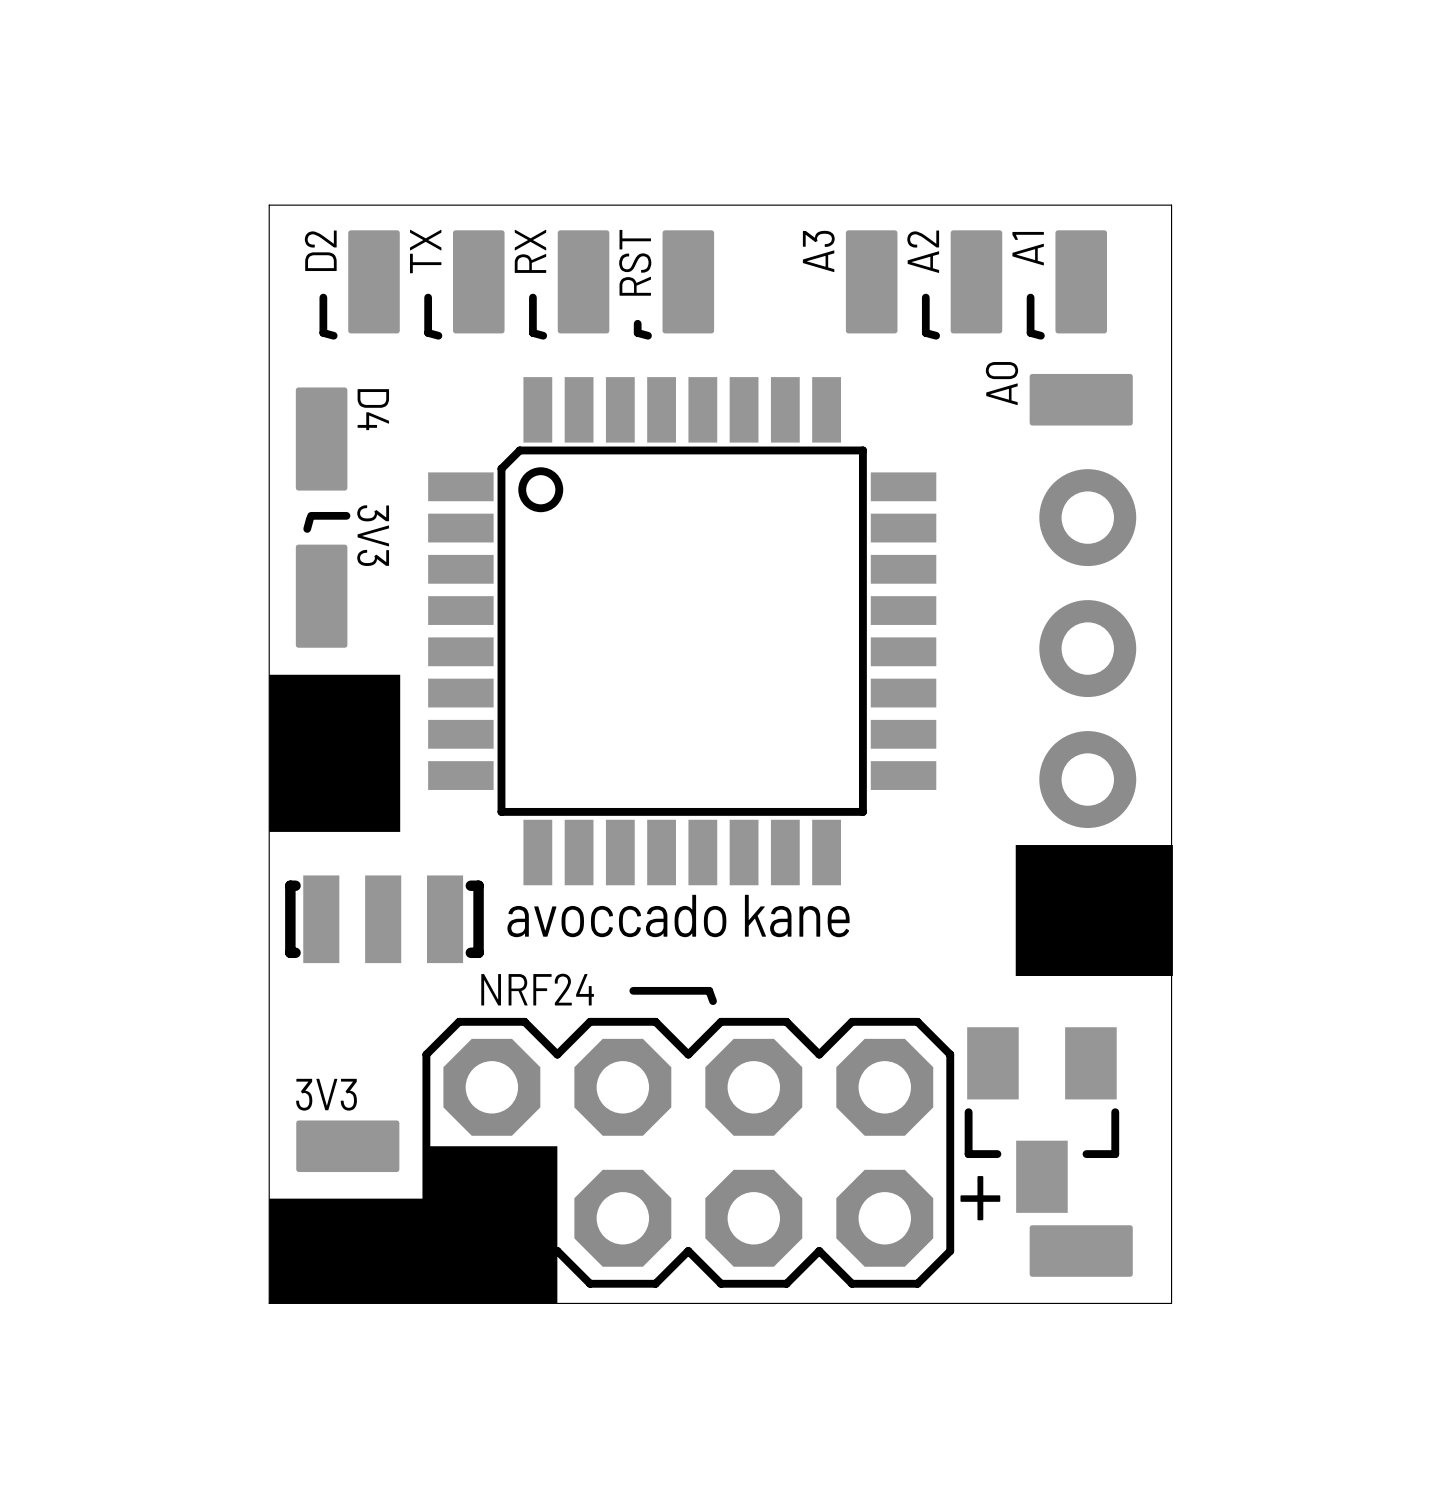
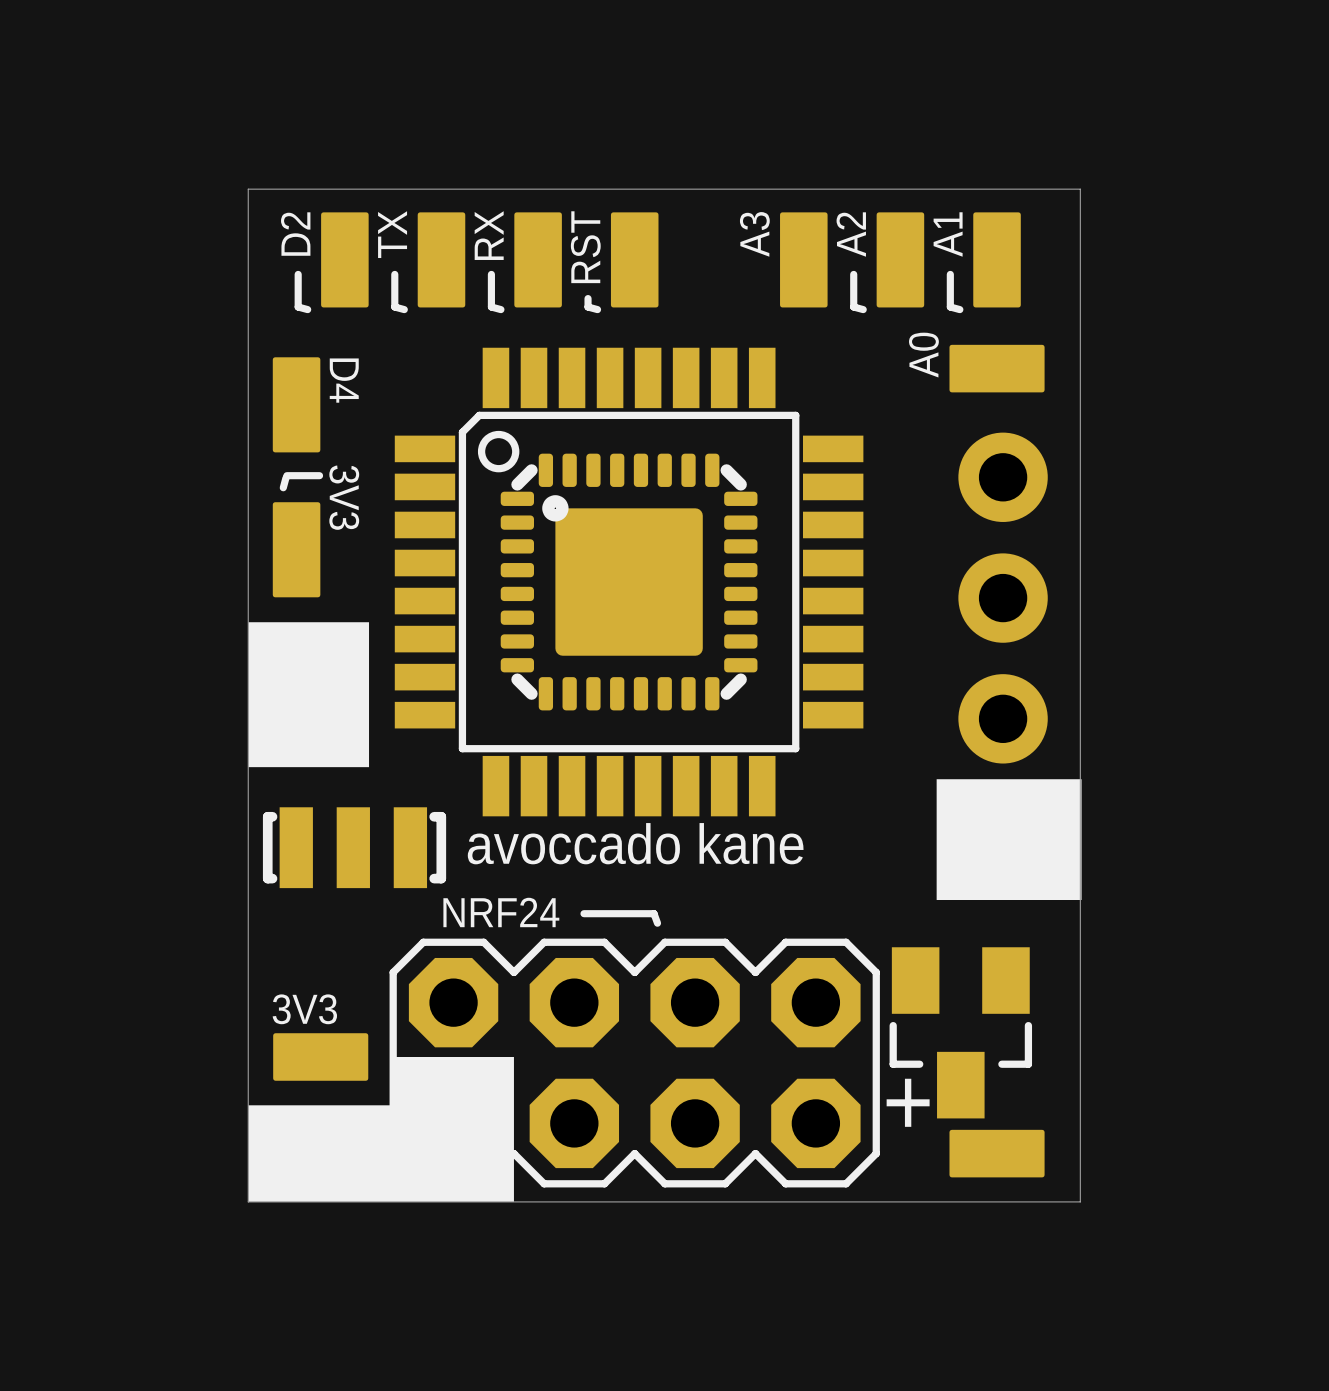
part: none -> (629, 582)

